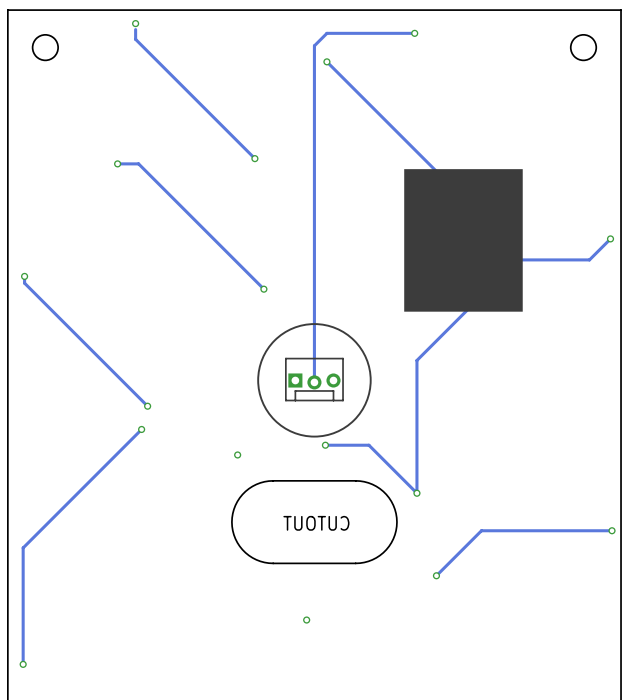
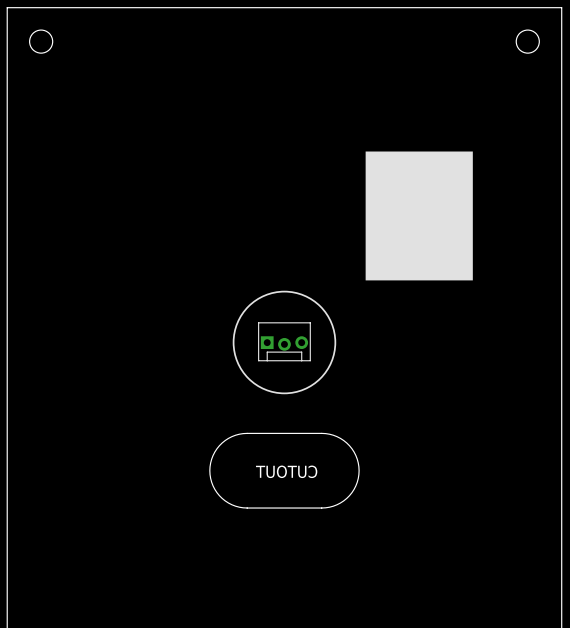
via: (135, 23) -> none
track: (135, 29) (135, 39) (254, 158) -> none
track: (414, 33) (326, 33) (314, 45) (314, 382) -> none
via: (414, 33) -> none
track: (326, 61) (458, 193) (479, 193) -> none
via: (326, 61) -> none
via: (254, 158) -> none
track: (117, 163) (138, 163) (263, 289) -> none
via: (117, 163) -> none
track: (610, 238) (589, 259) (479, 259) -> none
via: (610, 238) -> none
track: (24, 276) (24, 283) (147, 406) -> none
via: (24, 276) -> none
via: (263, 289) -> none
track: (474, 302) (416, 360) (416, 493) (368, 445) (325, 445) -> none
via: (147, 406) -> none
track: (141, 429) (23, 547) (23, 664) -> none
via: (141, 429) -> none
via: (325, 445) -> none
via: (237, 454) -> none
via: (416, 493) -> none
track: (612, 530) (481, 530) (436, 575) -> none
via: (612, 530) -> none
via: (436, 575) -> none
via: (306, 620) -> none
via: (23, 664) -> none

